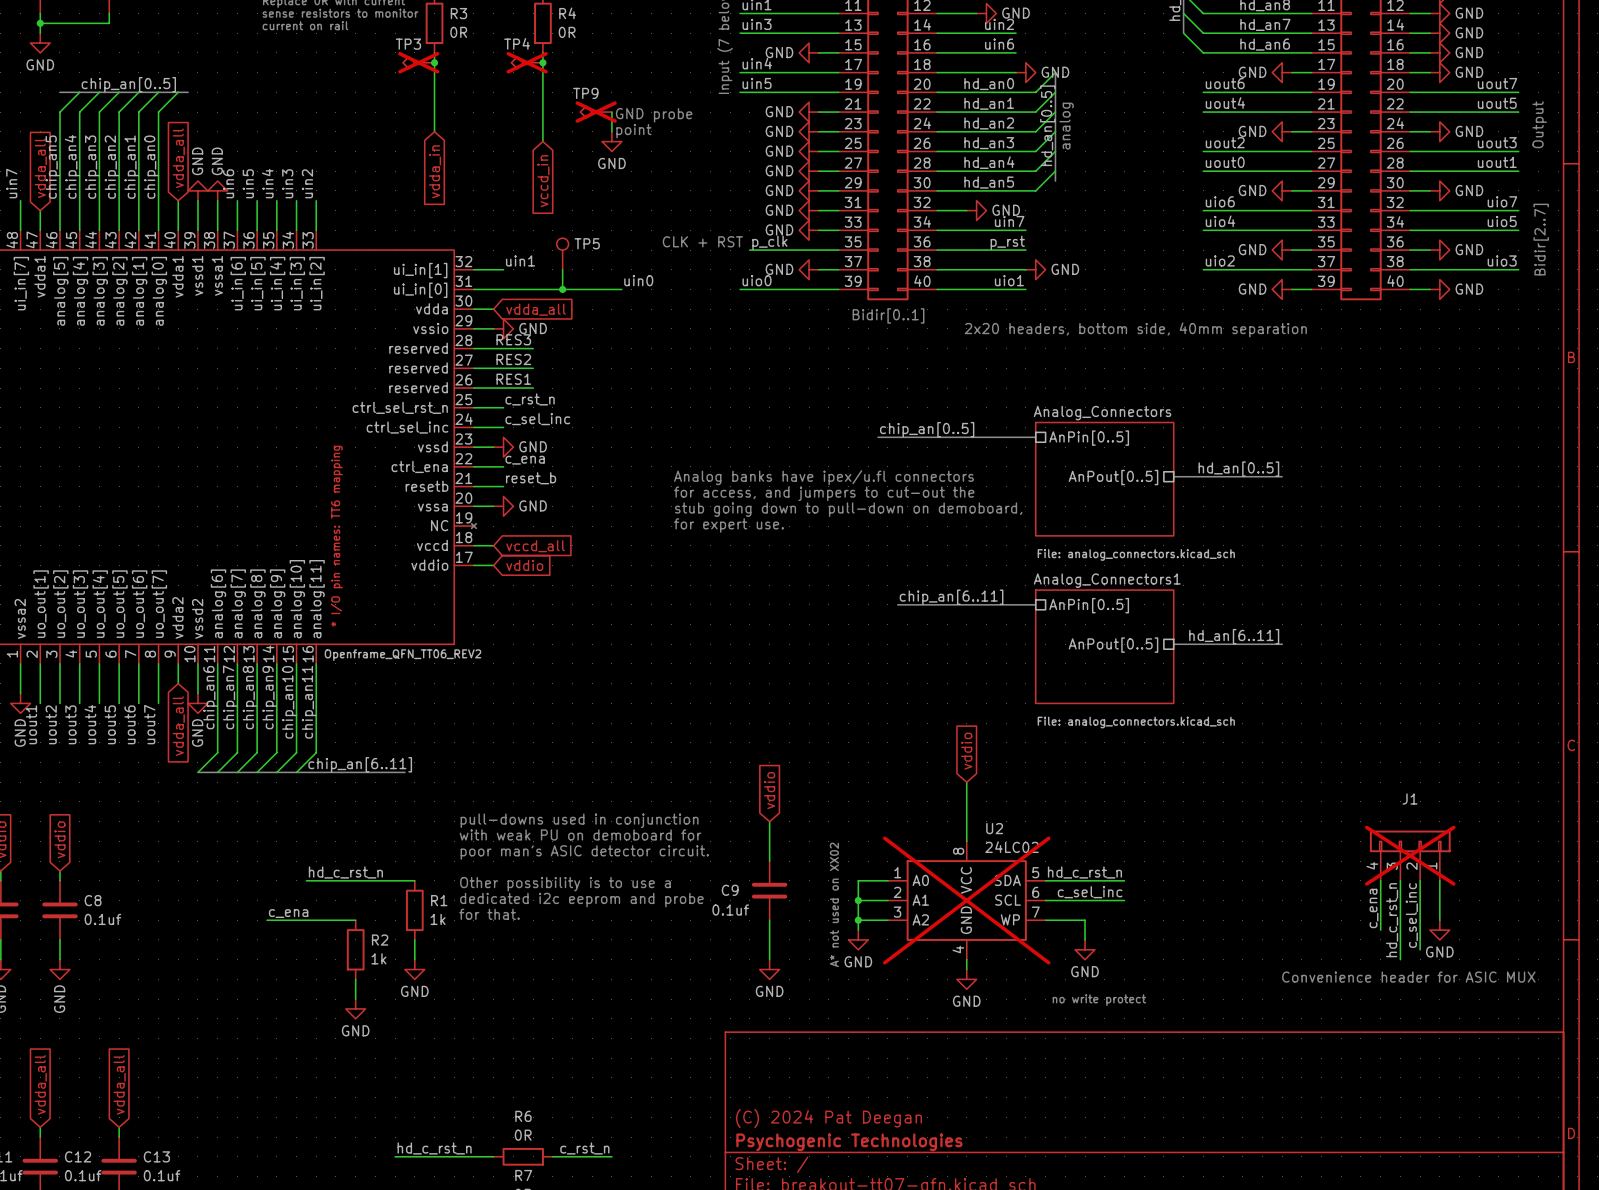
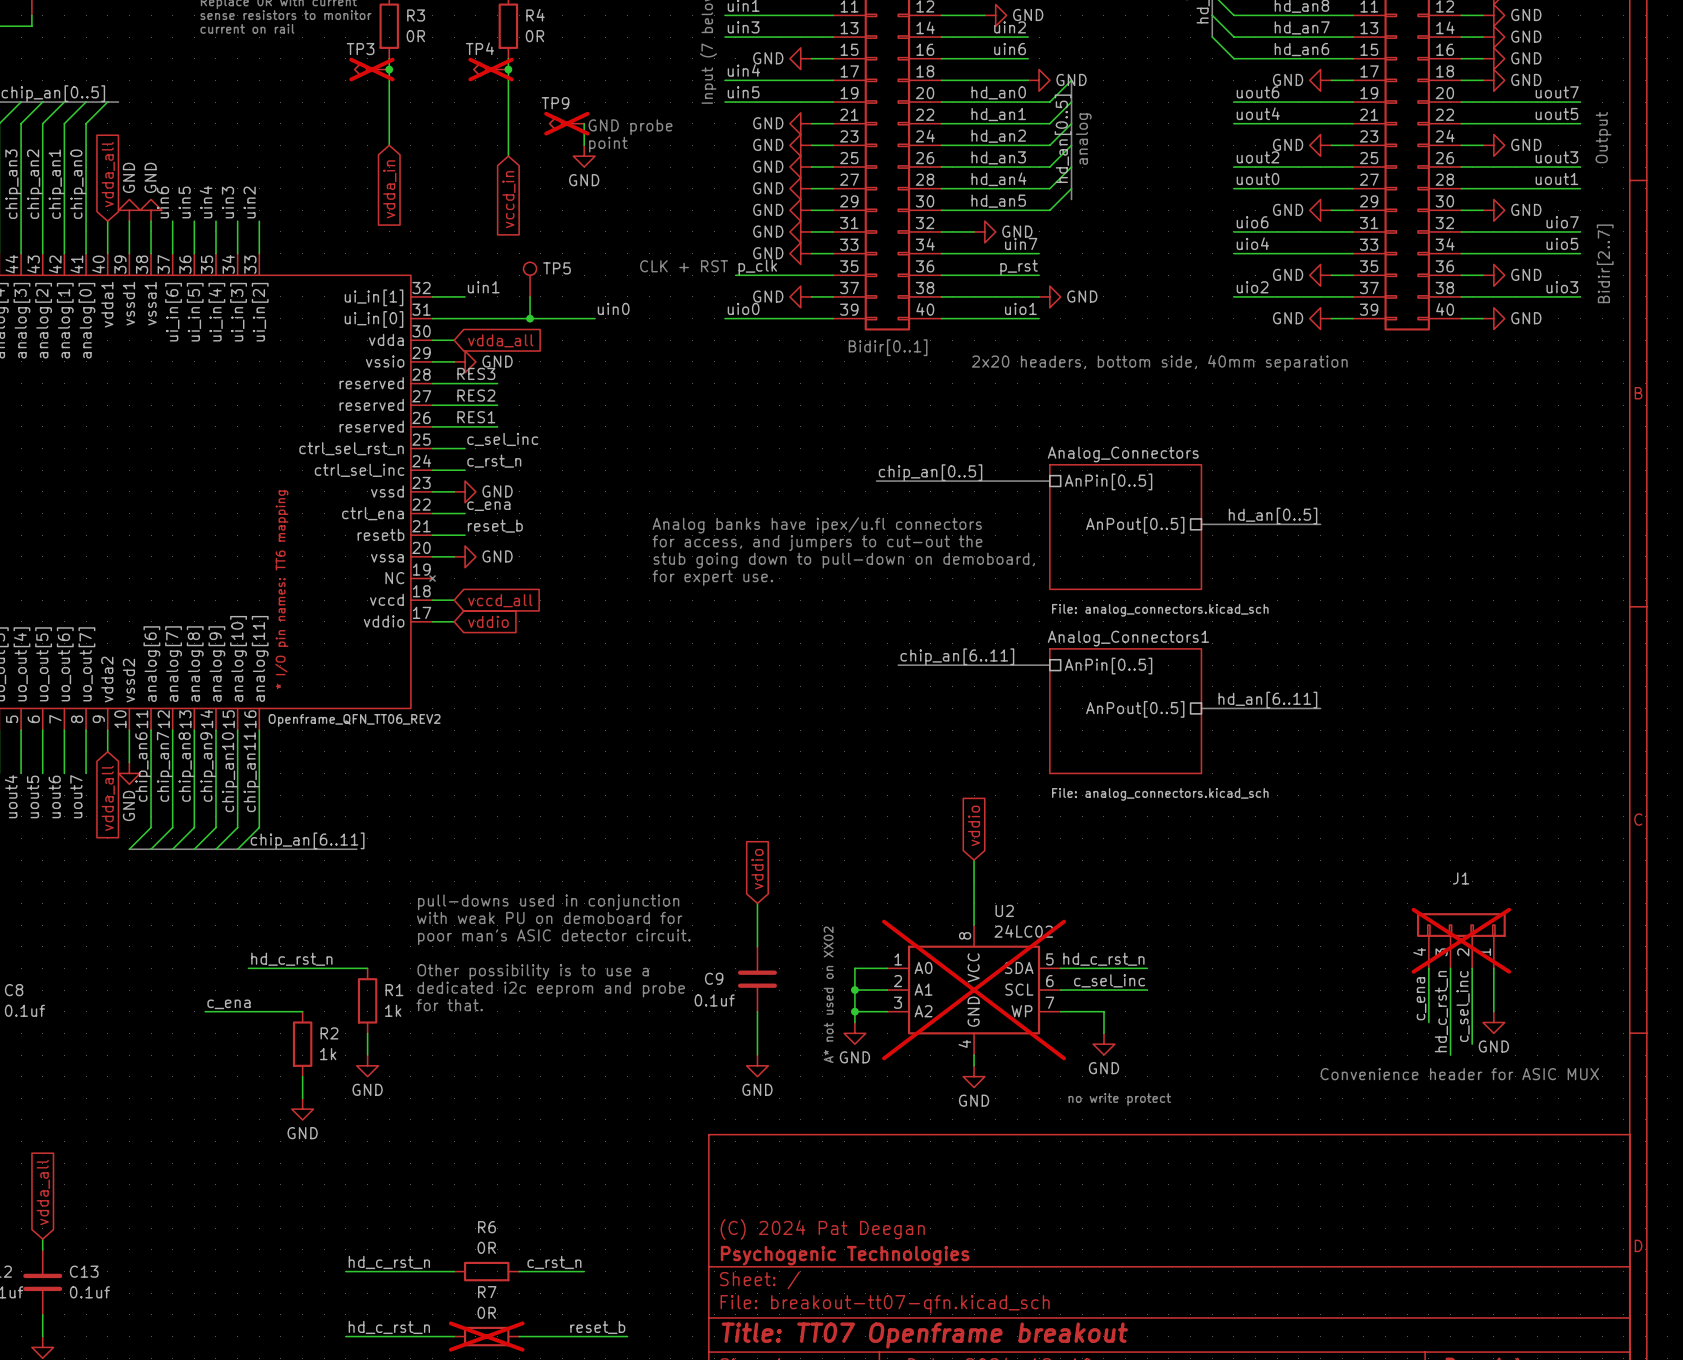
label: c_rst_n (530, 399) -> c_sel_inc (502, 439)
label: c_sel_inc (537, 419) -> c_rst_n (494, 461)

